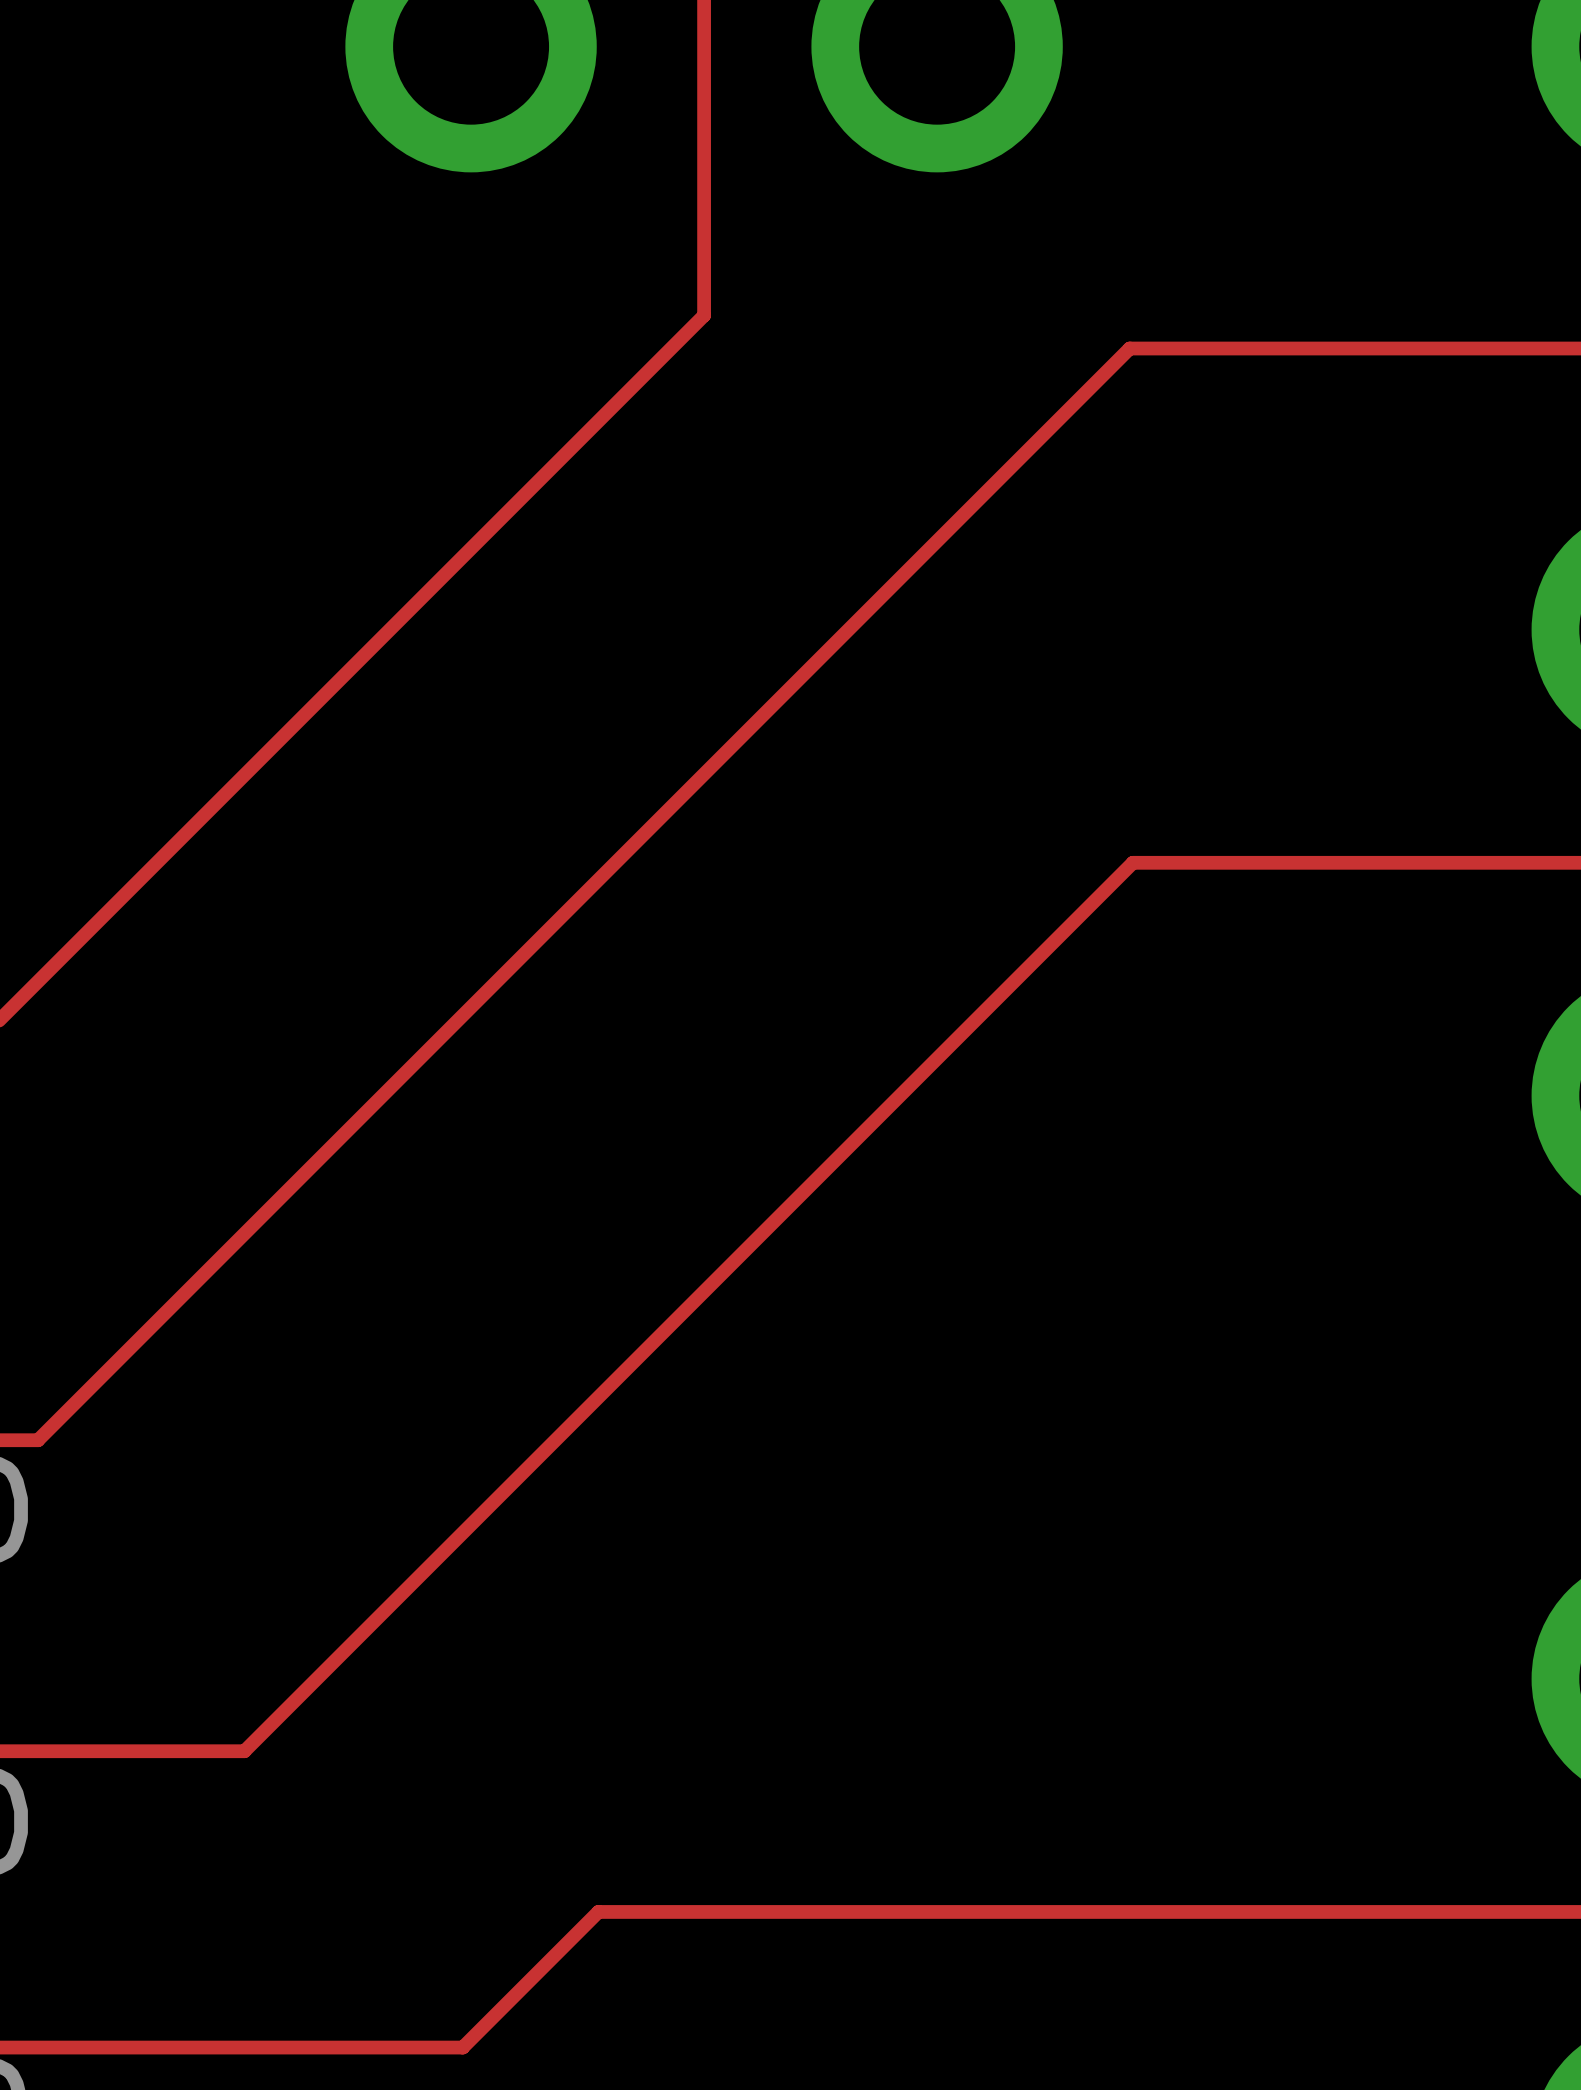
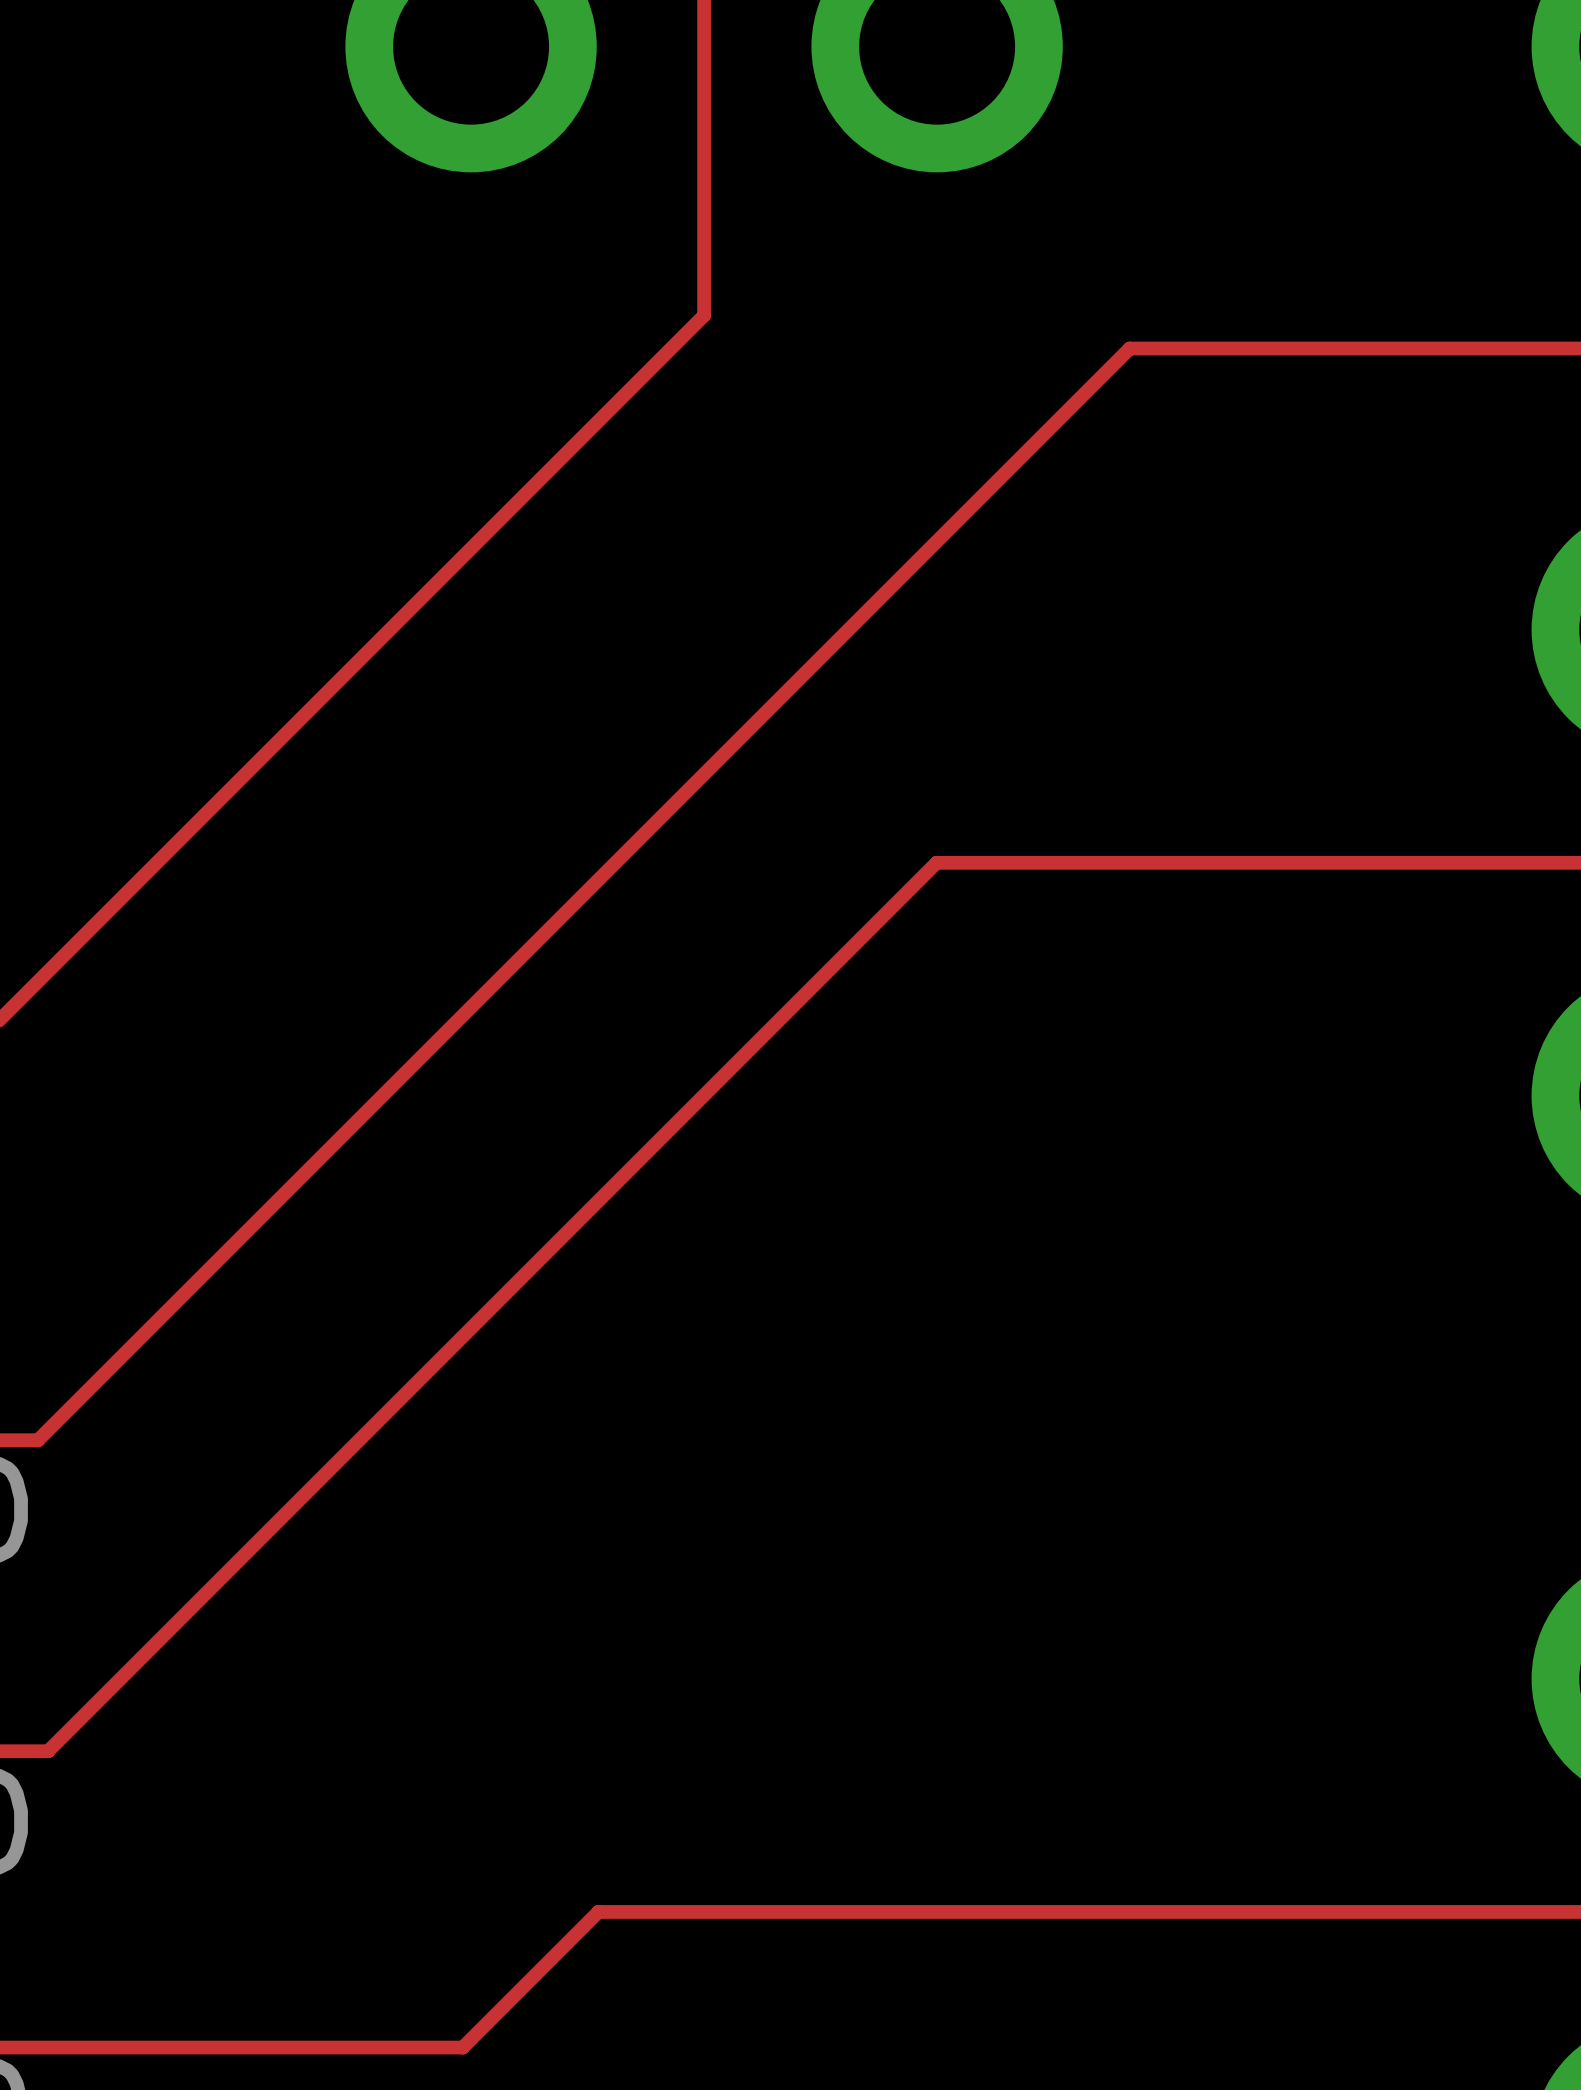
top track: (1132, 862) (244, 1751) (48, 1751) -> (1132, 862) (936, 862) (48, 1751)

